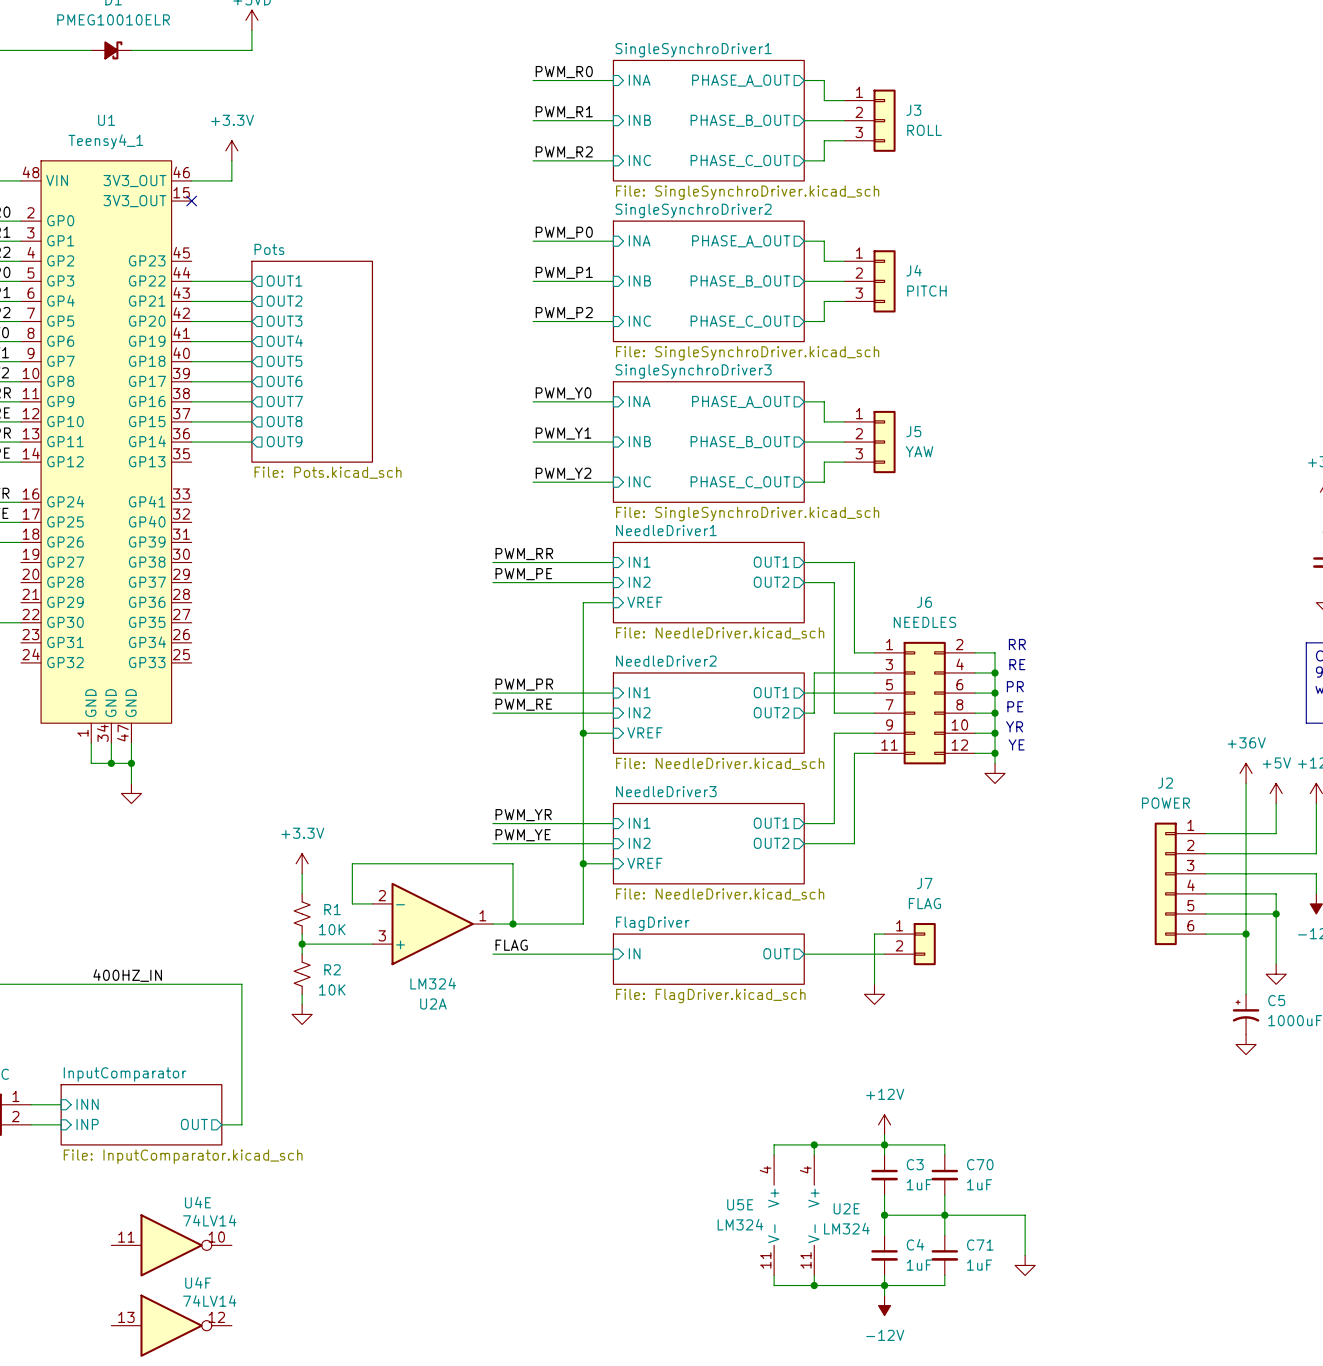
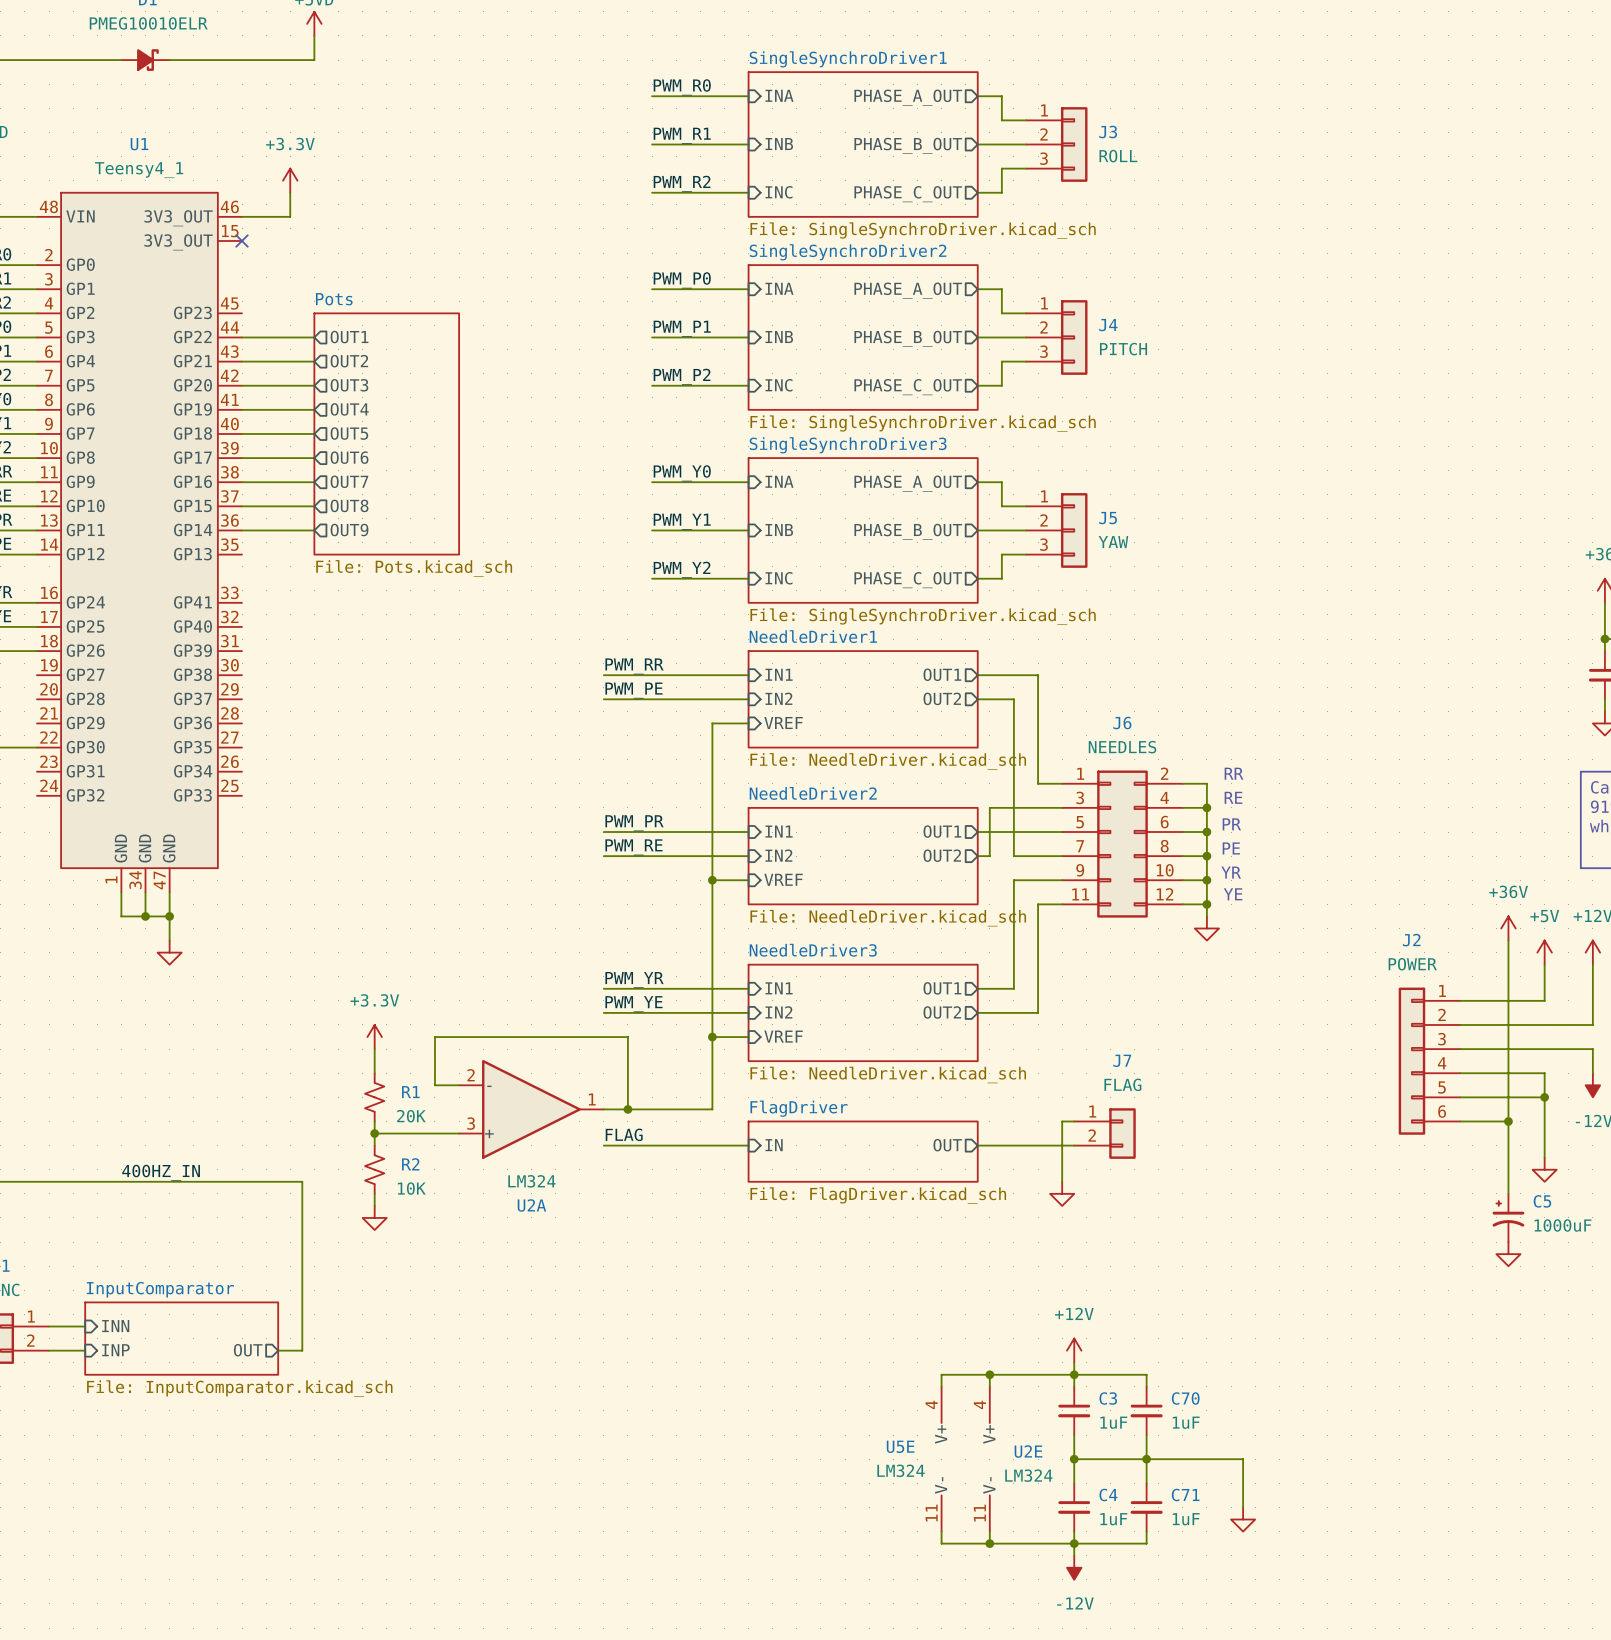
R1 value: 10K (332, 929) -> 20K (411, 1116)
U4E: 74LV14 (171, 1245) -> none
U4F: 74LV14 (171, 1325) -> none

